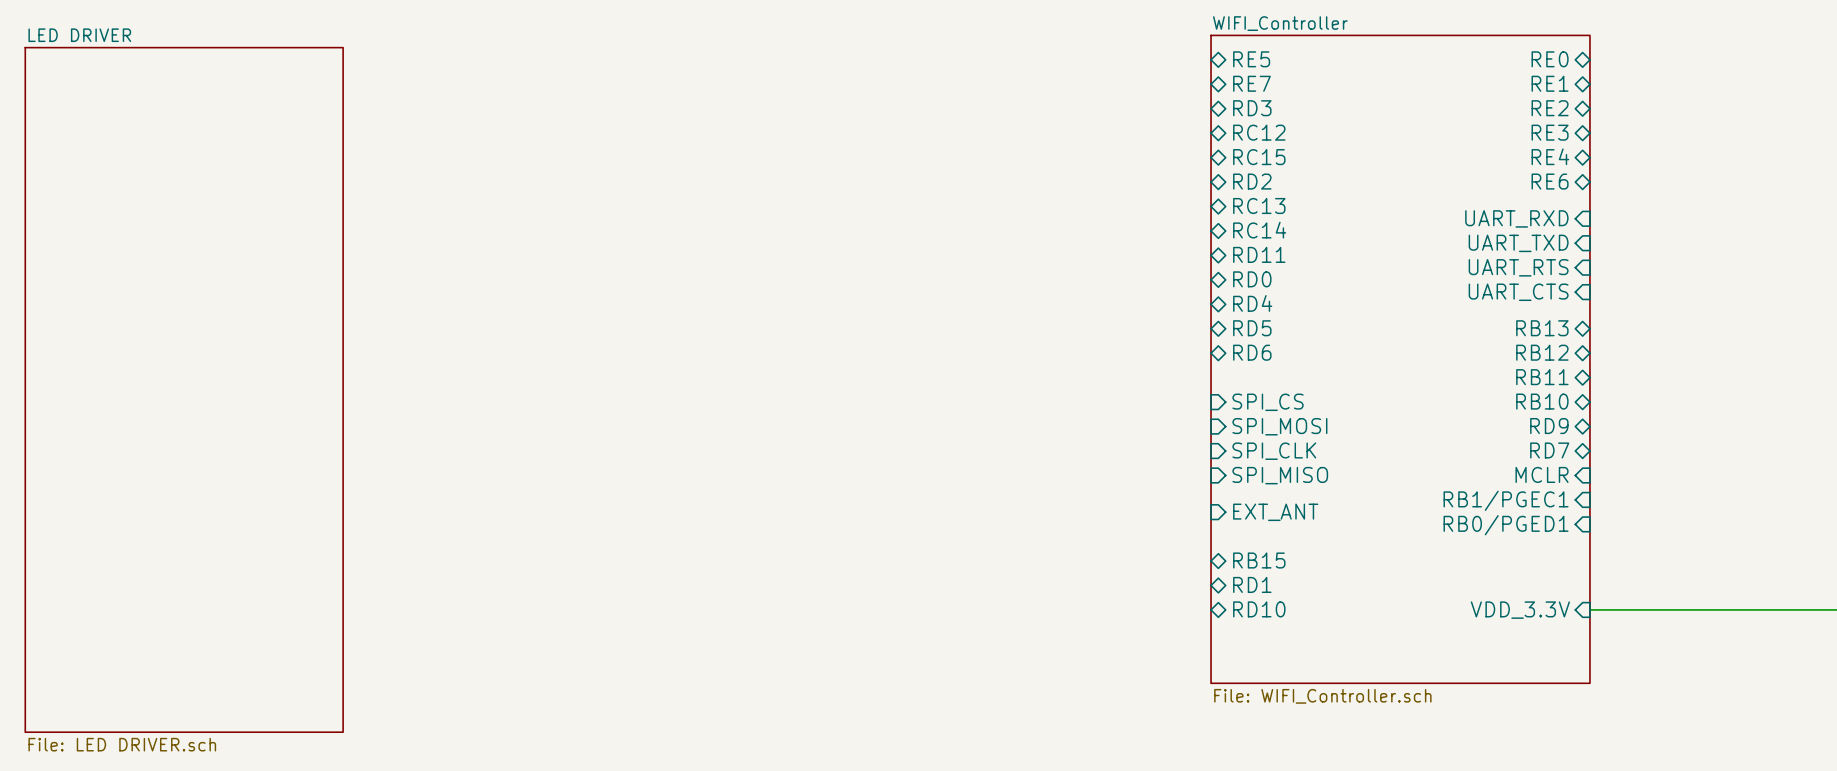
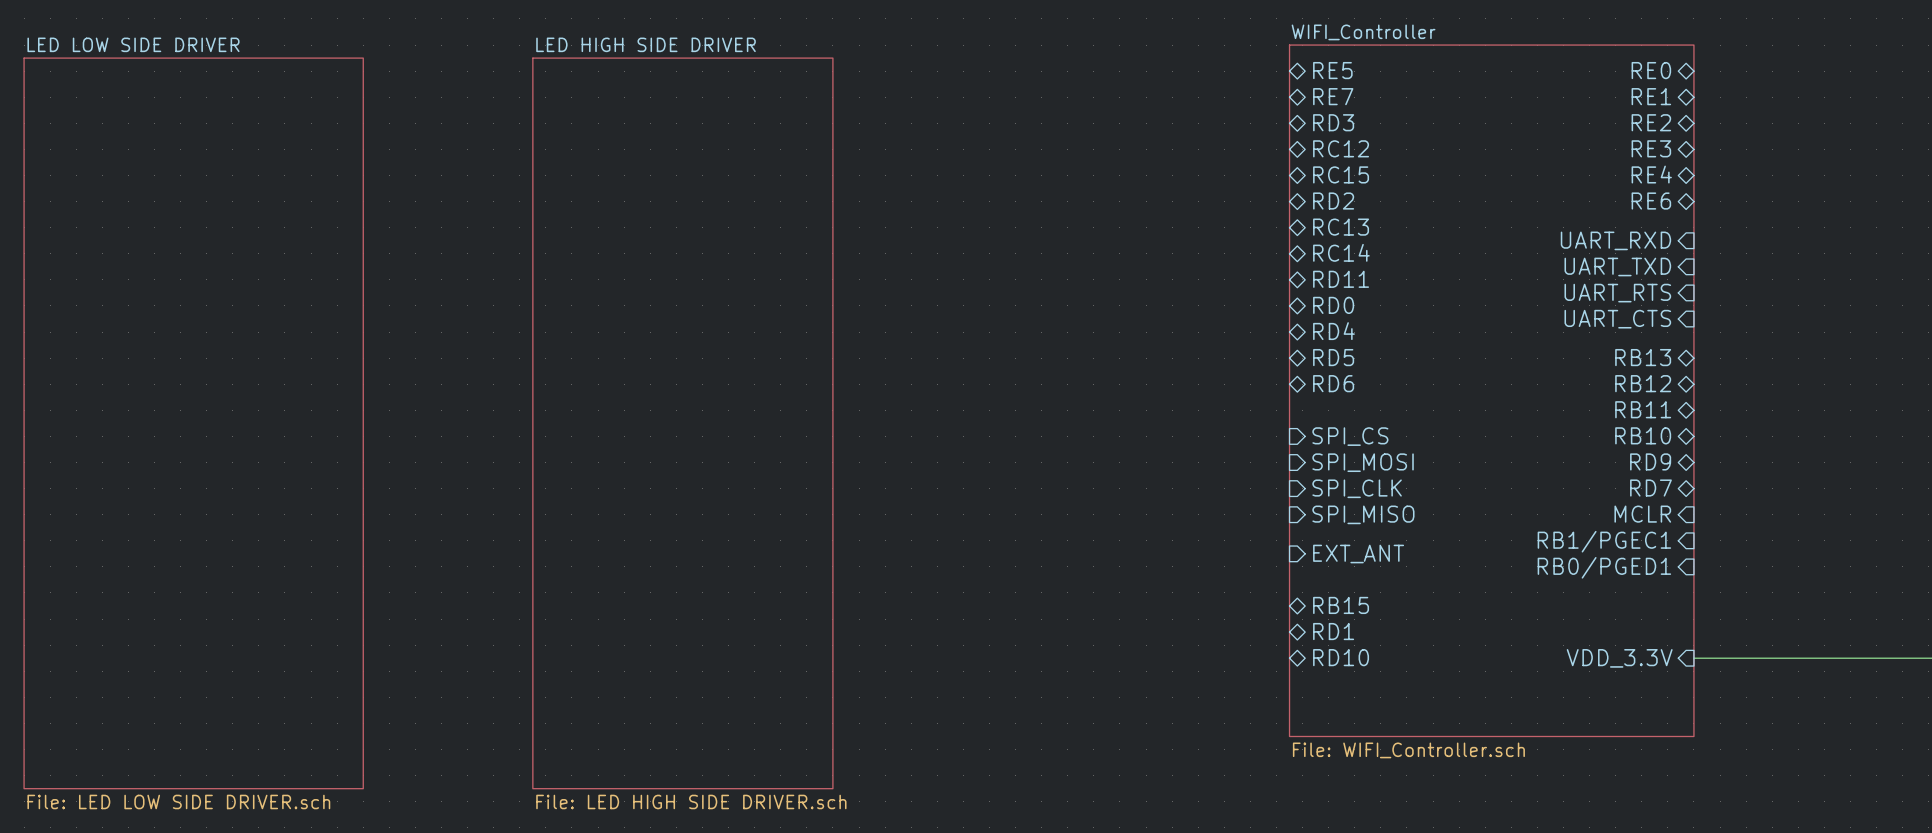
sheet LED DRIVER name: LED DRIVER (79, 35) -> LED LOW SIDE DRIVER (133, 44)
sheet LED HIGH SIDE DRIVER: none -> File: LED HIGH SIDE DRIVER.sch (682, 423)
sheet LED DRIVER value: File: LED DRIVER.sch (122, 744) -> File: LED LOW SIDE DRIVER.sch (178, 801)

